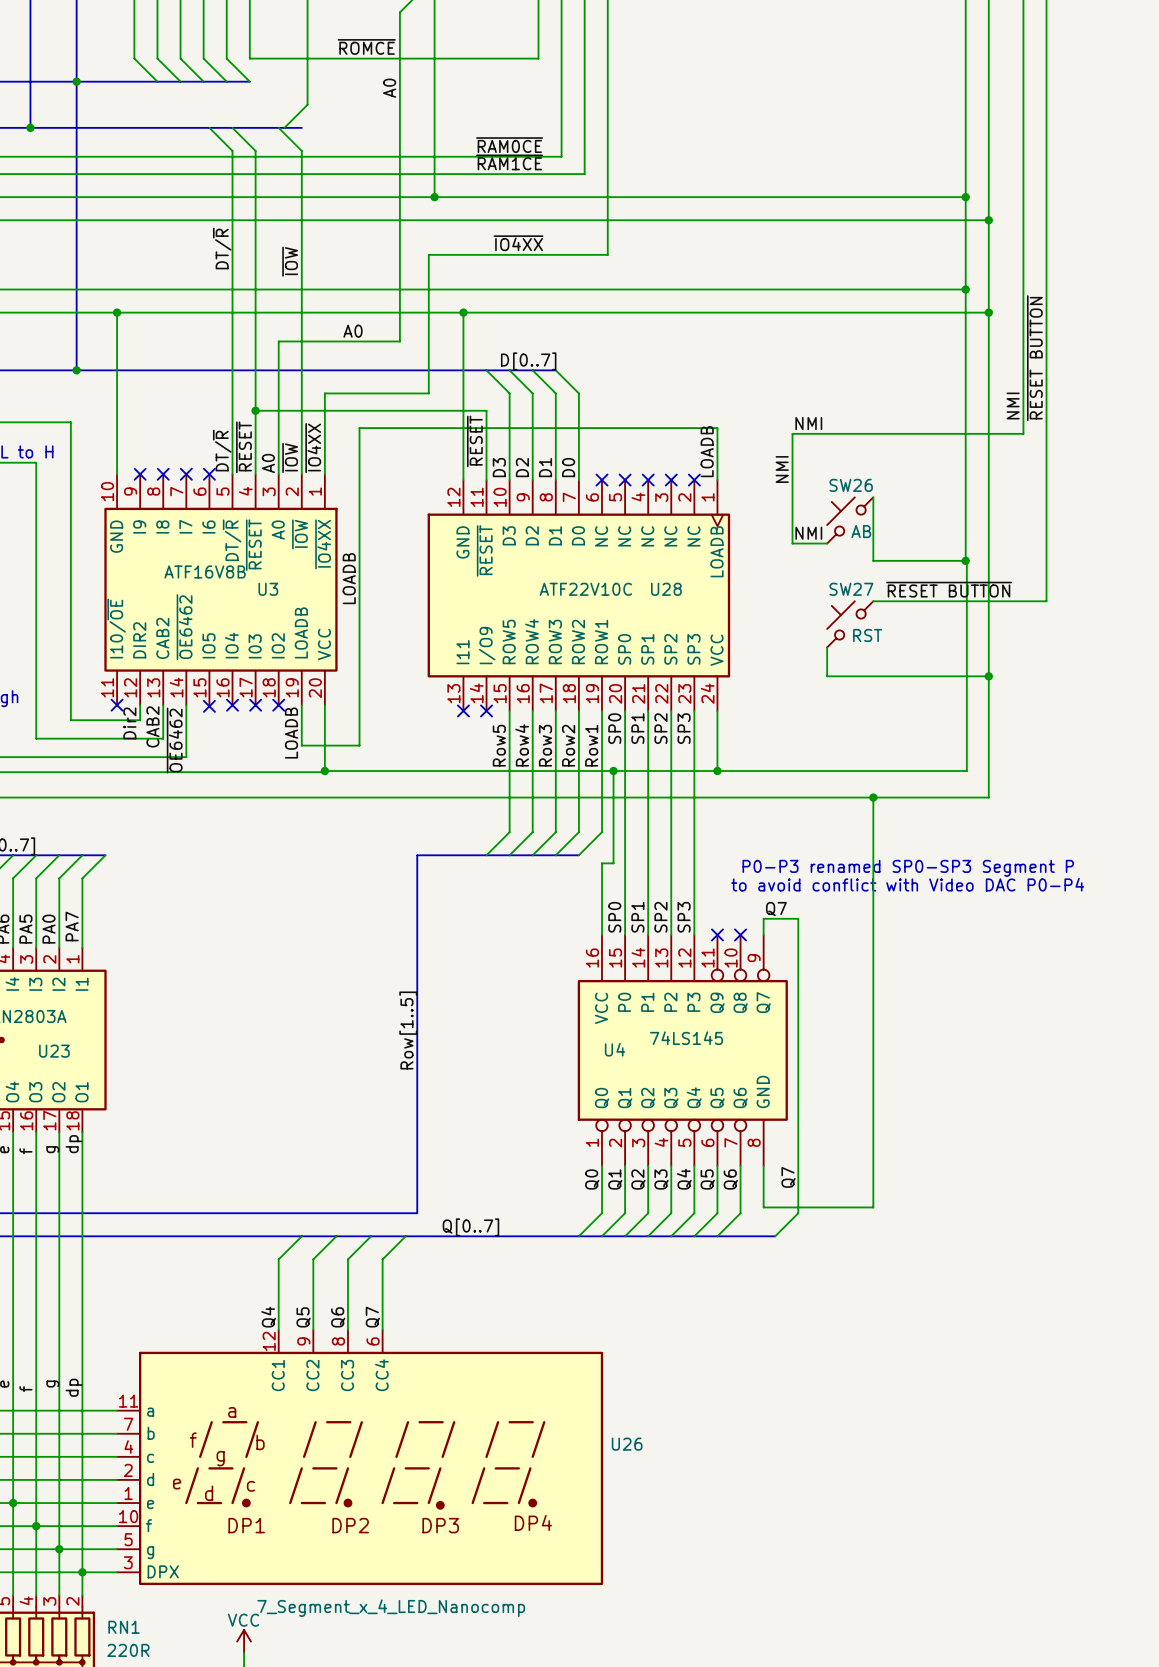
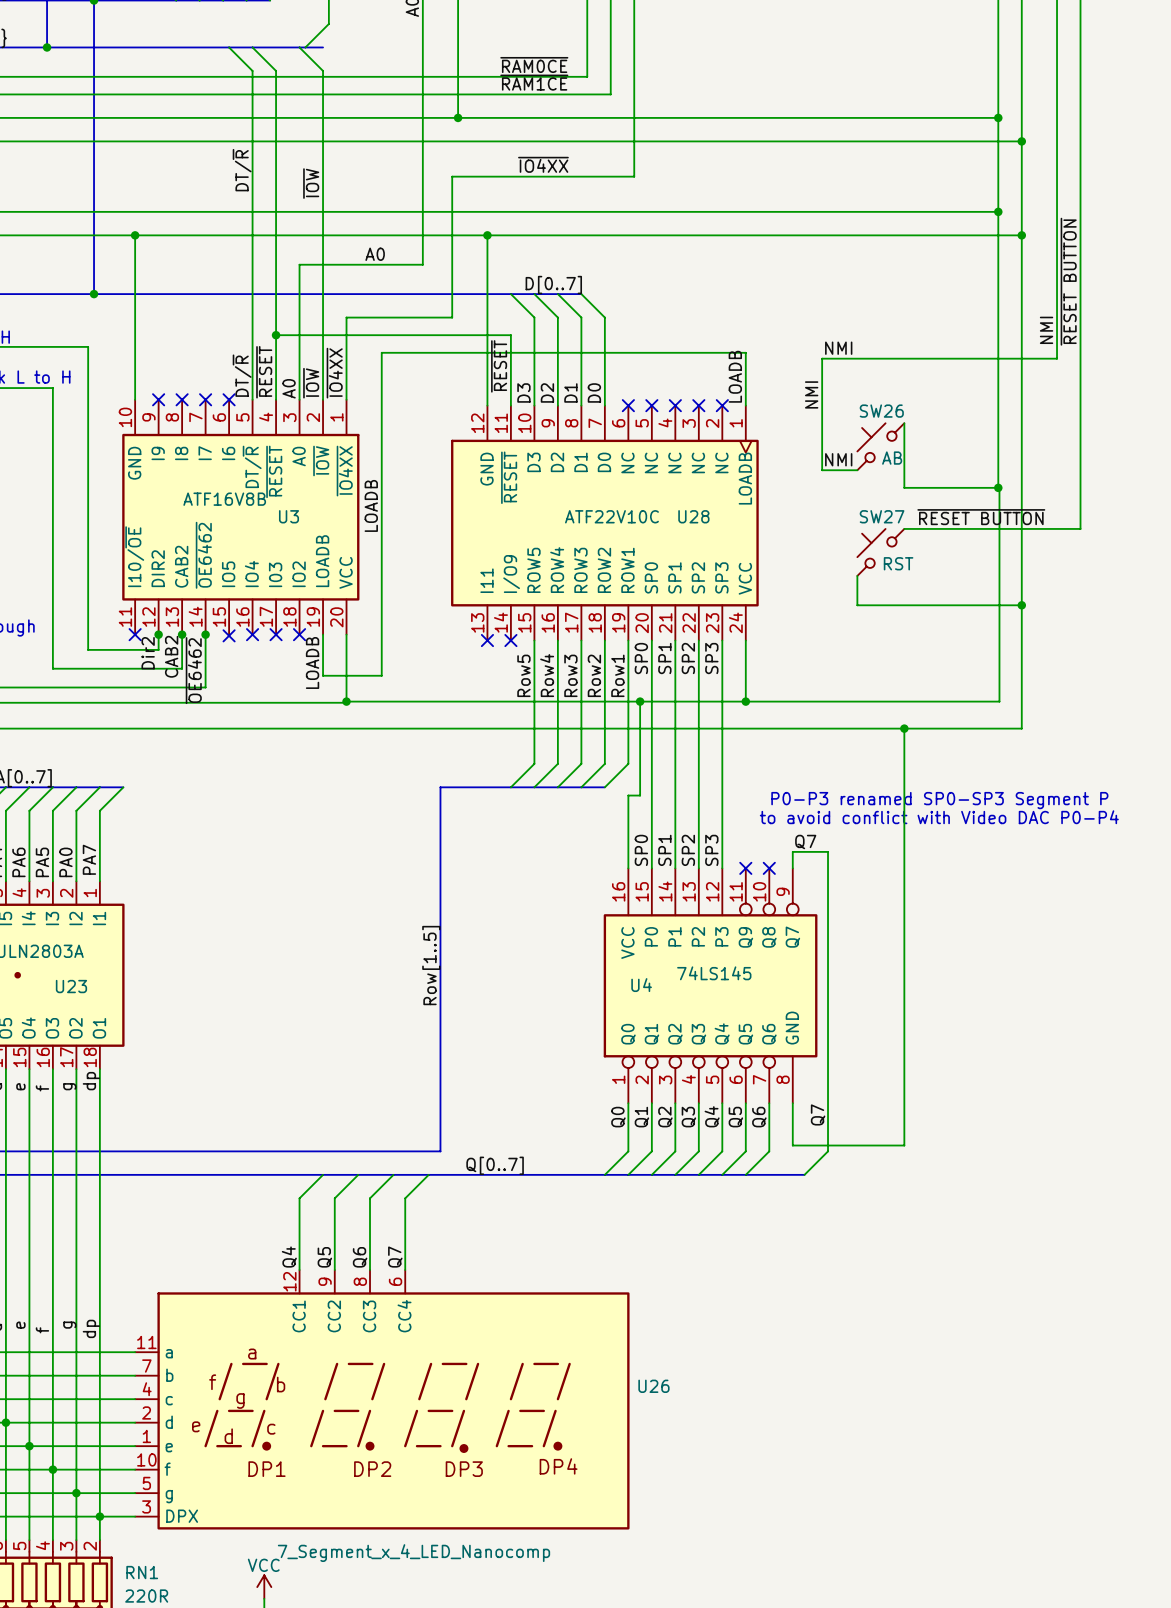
junction: none -> (158, 634)
junction: none -> (182, 634)
junction: none -> (205, 634)

